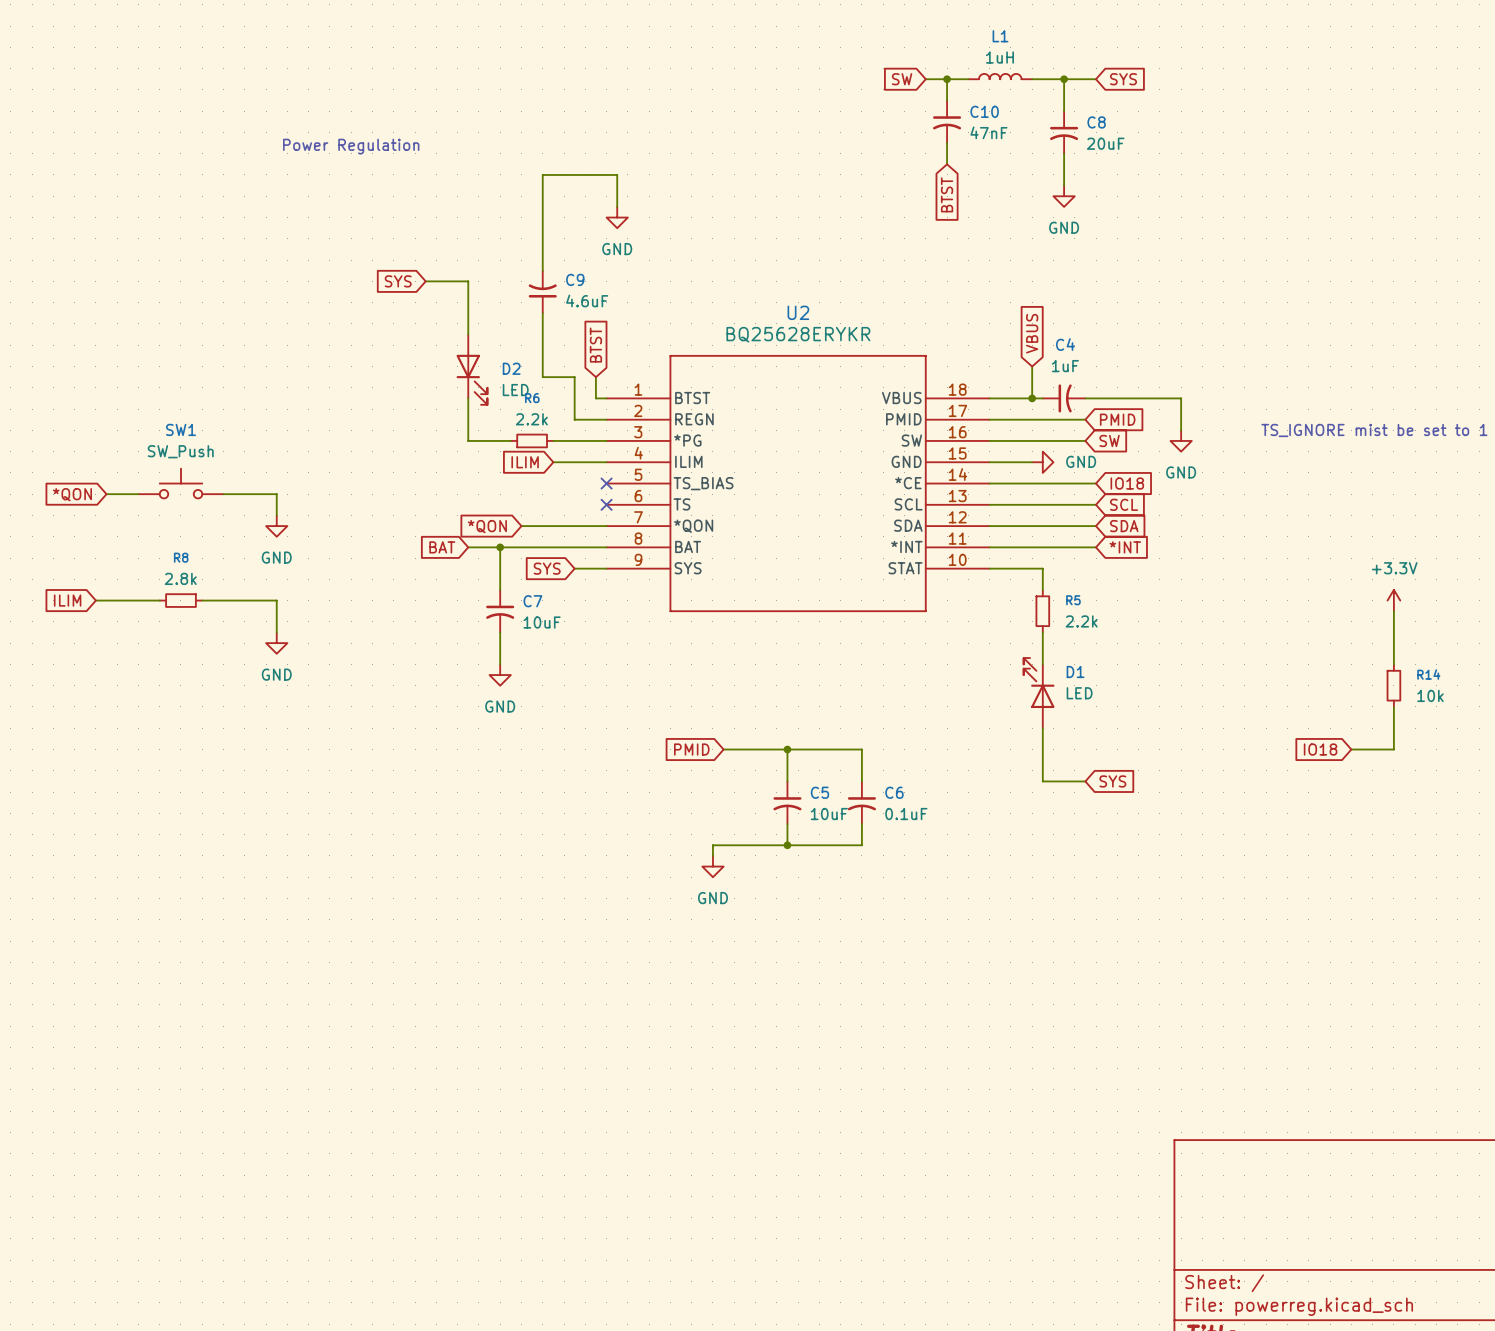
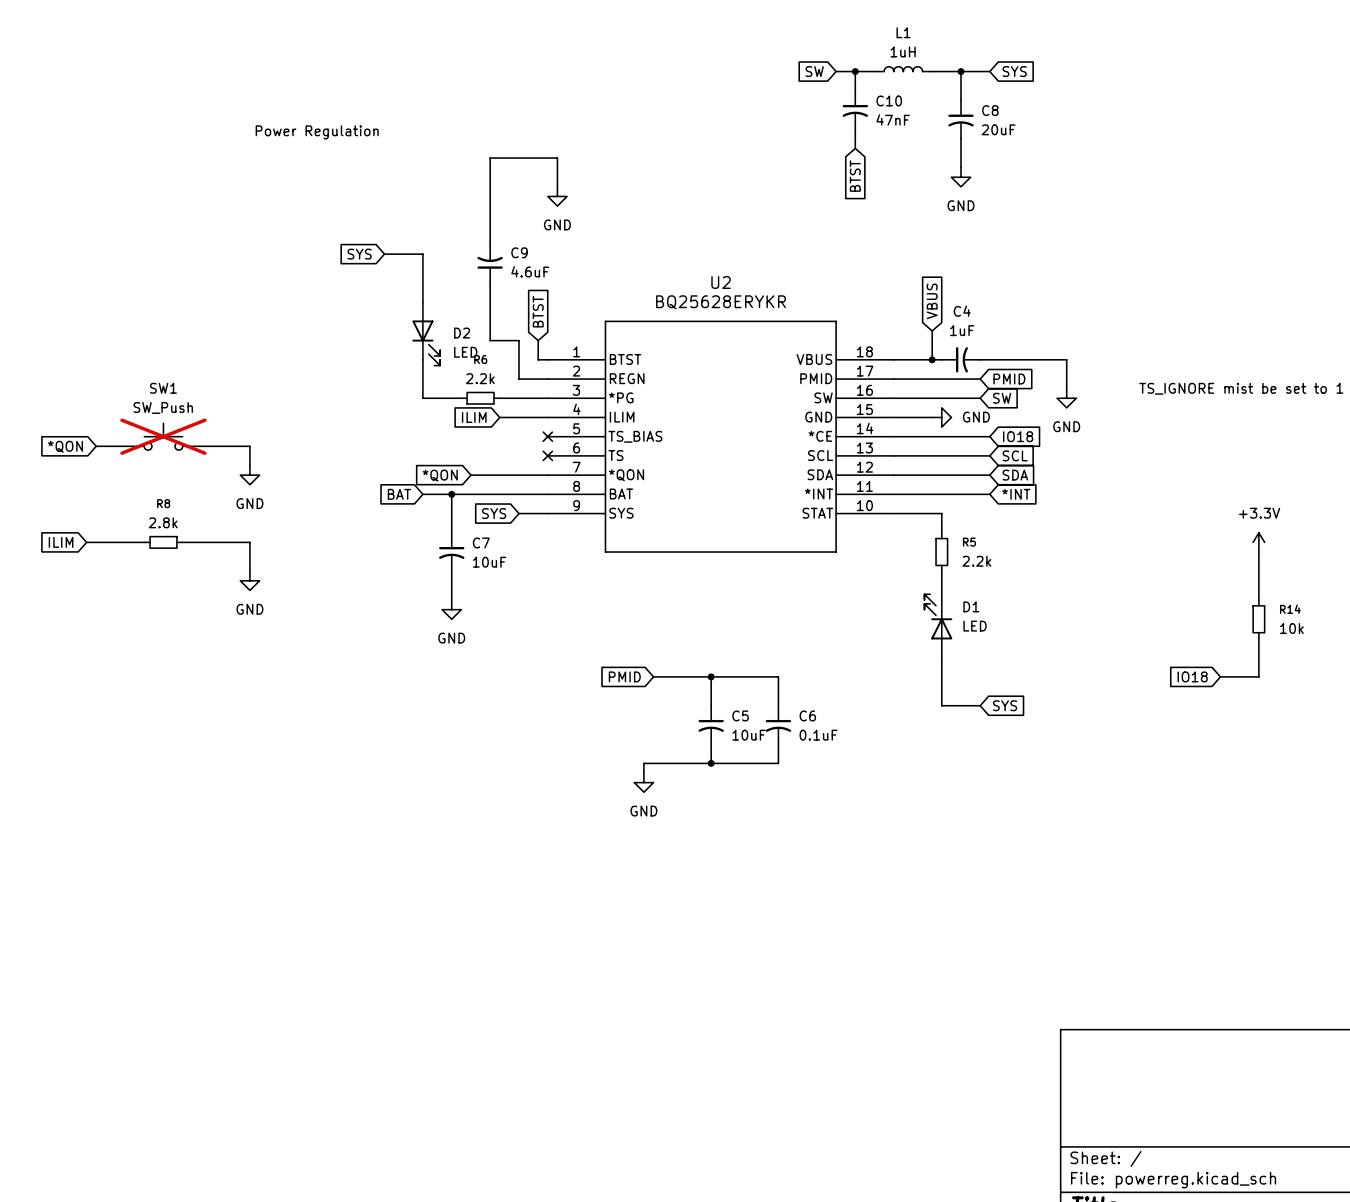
SW1 do-not-place cross: none -> (163, 436)

